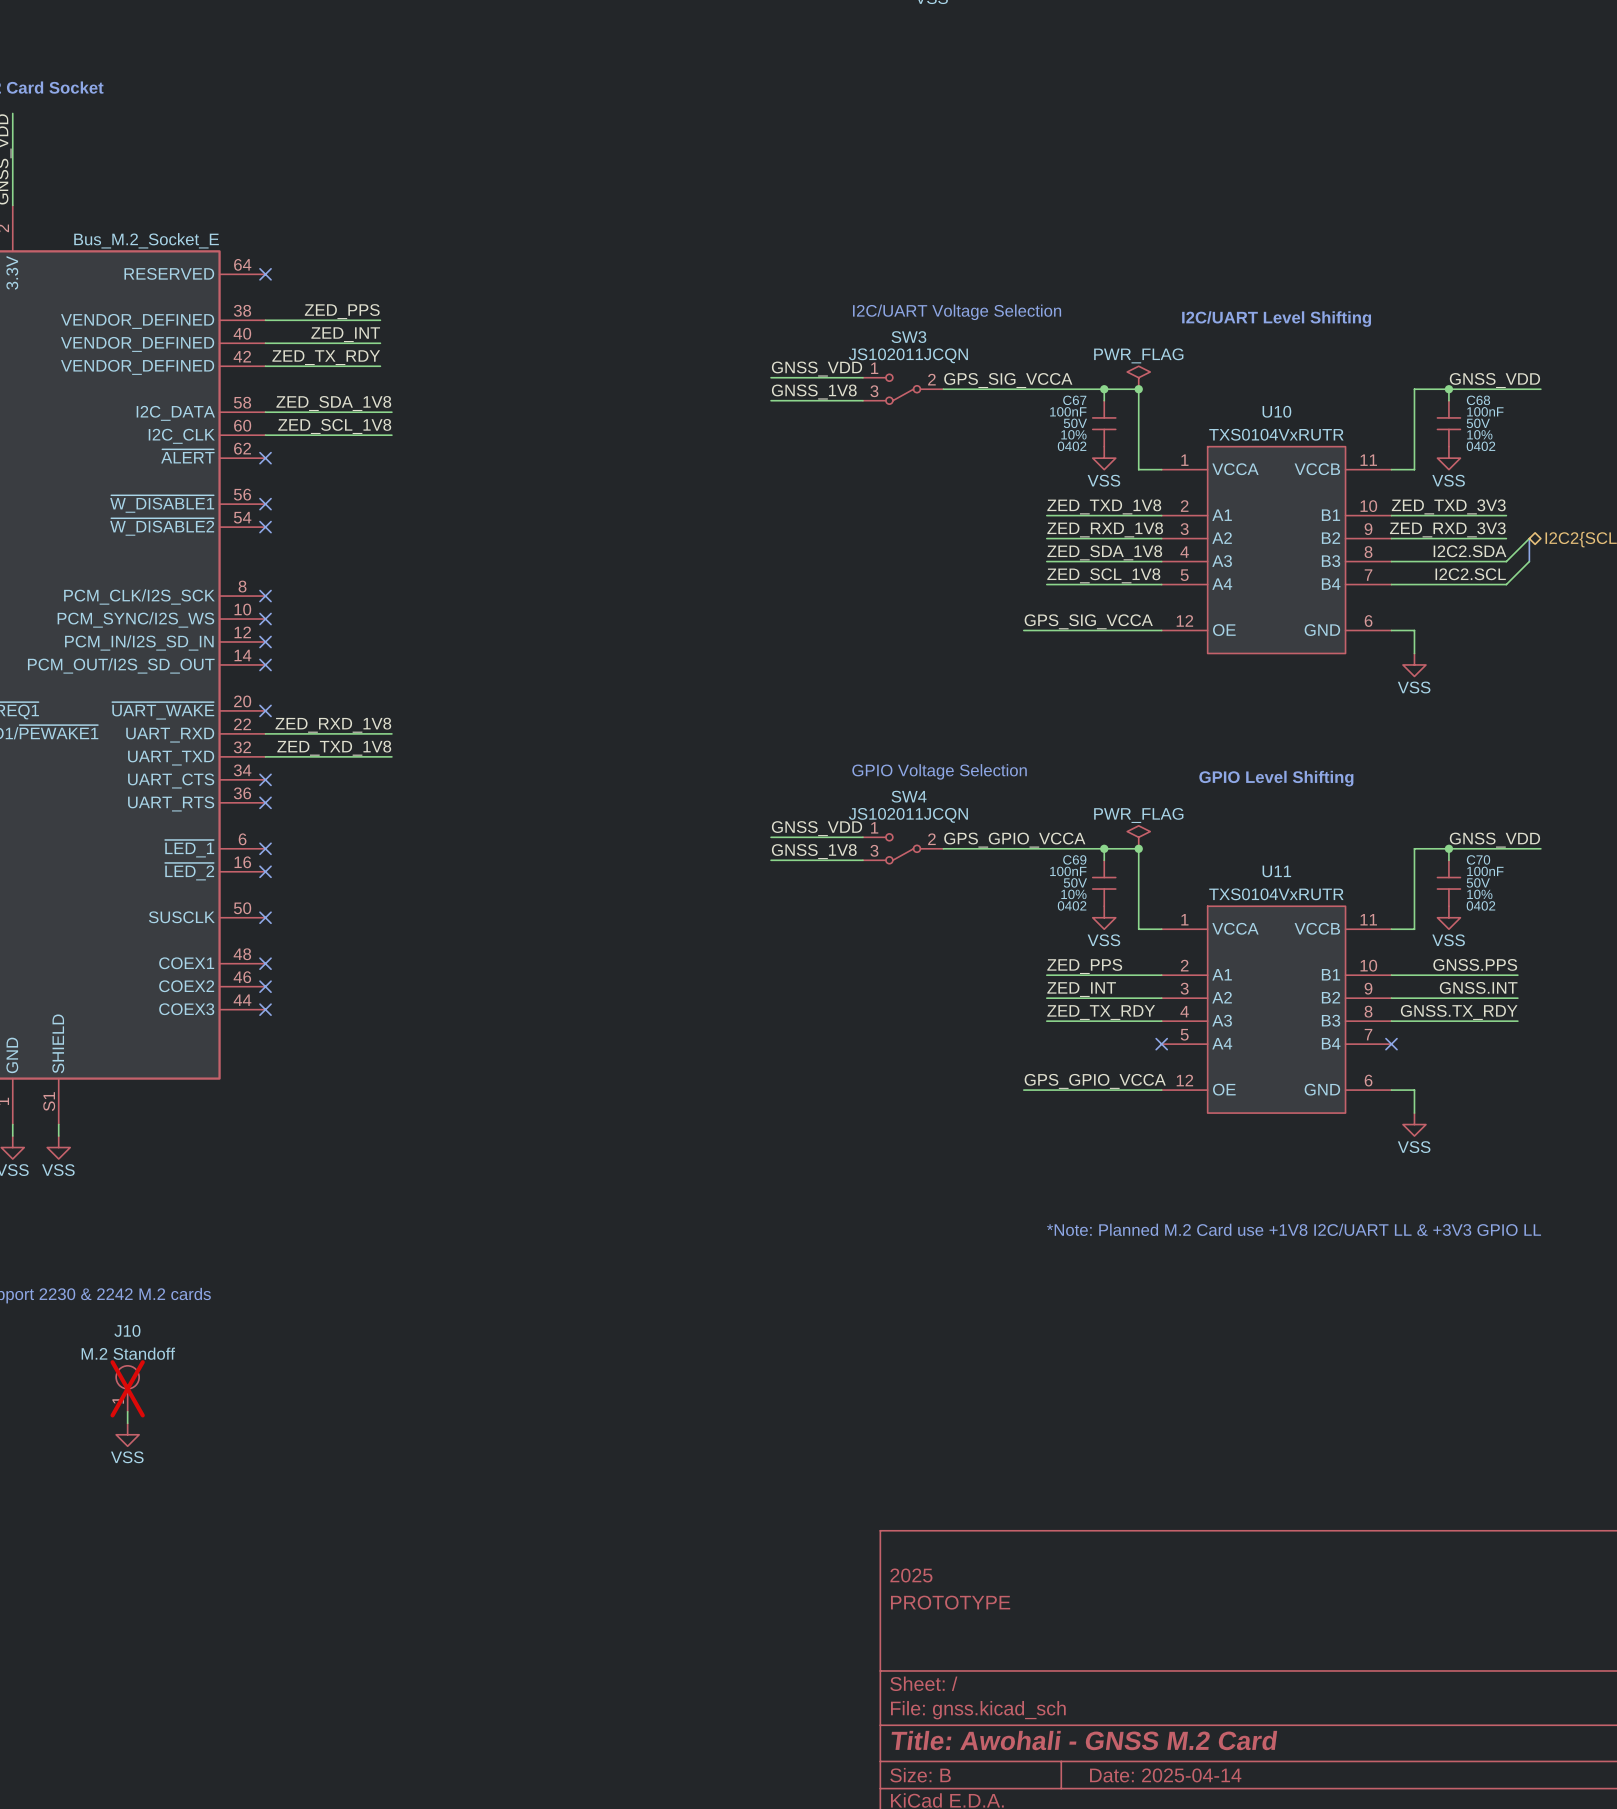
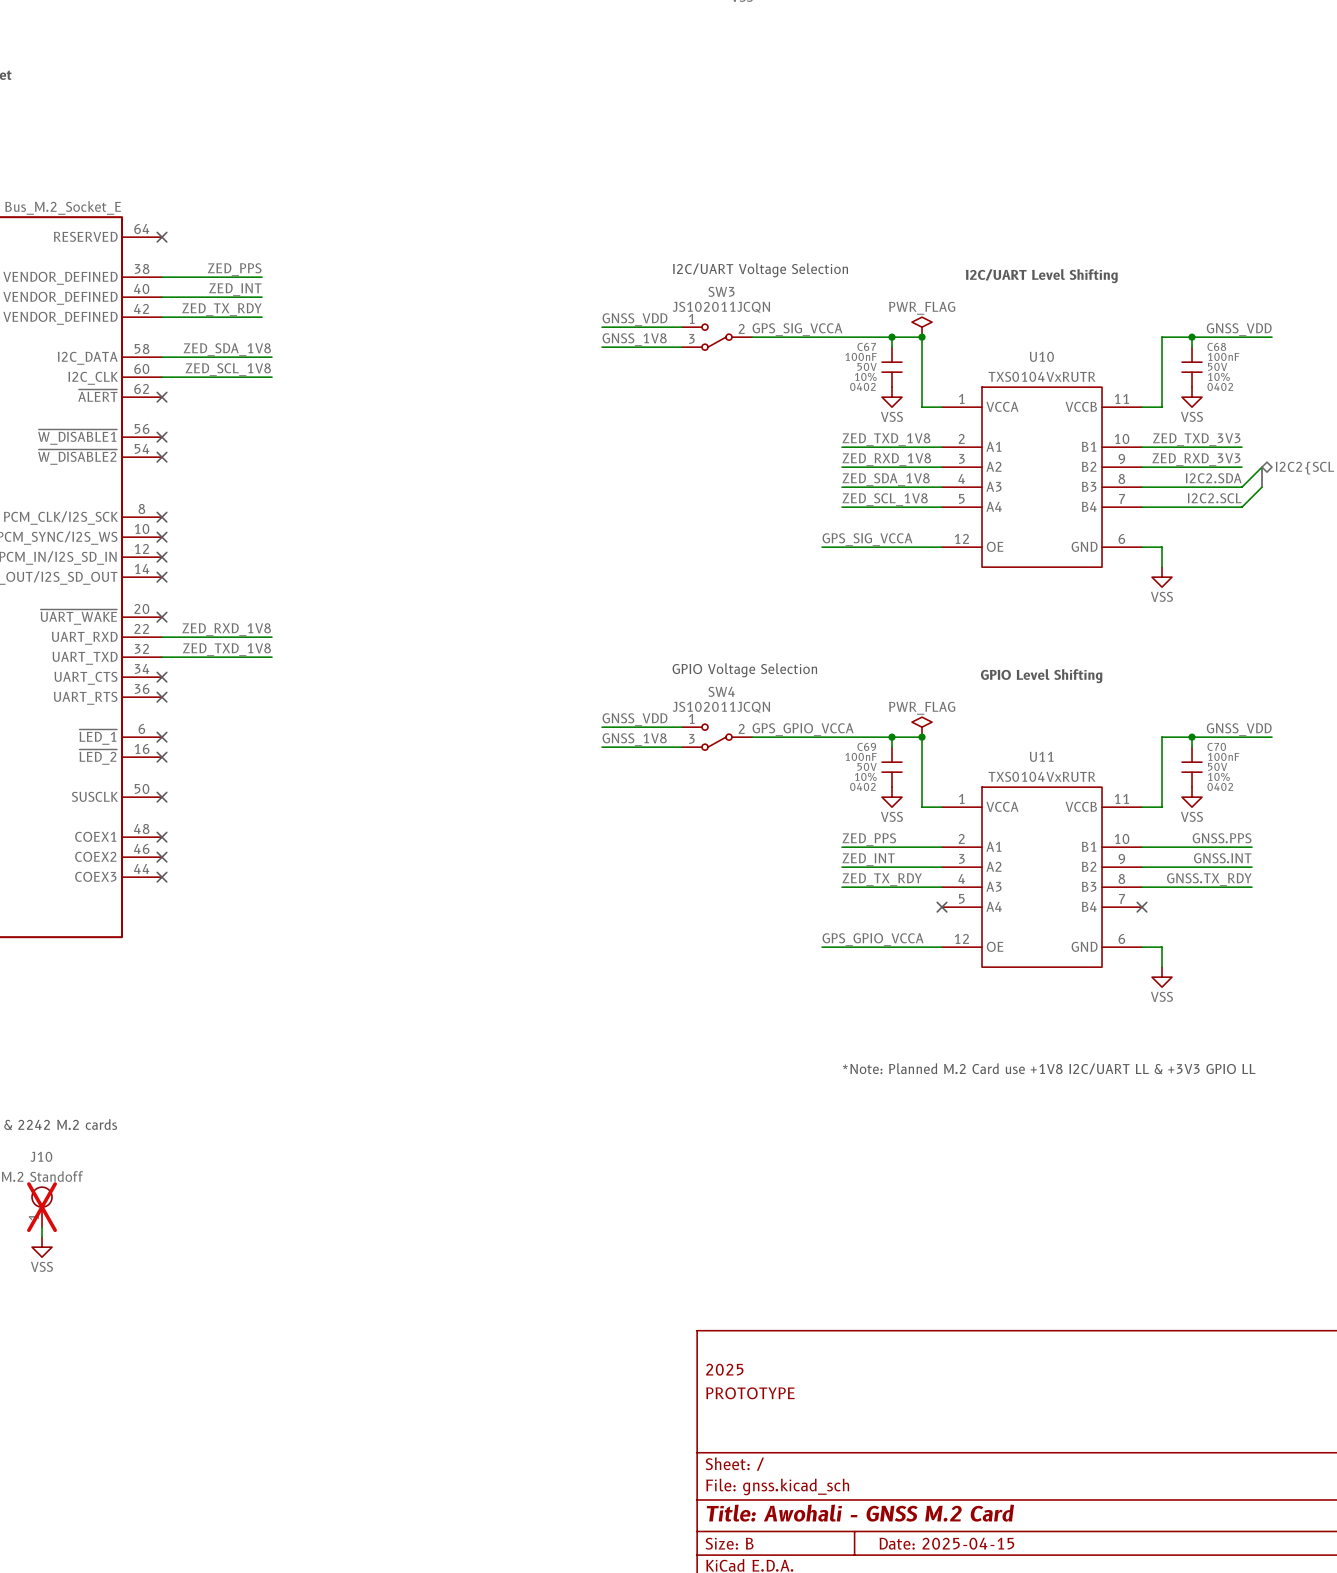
title block: Date: 2025-04-14 (1165, 1775) -> Date: 2025-04-15 (946, 1543)

